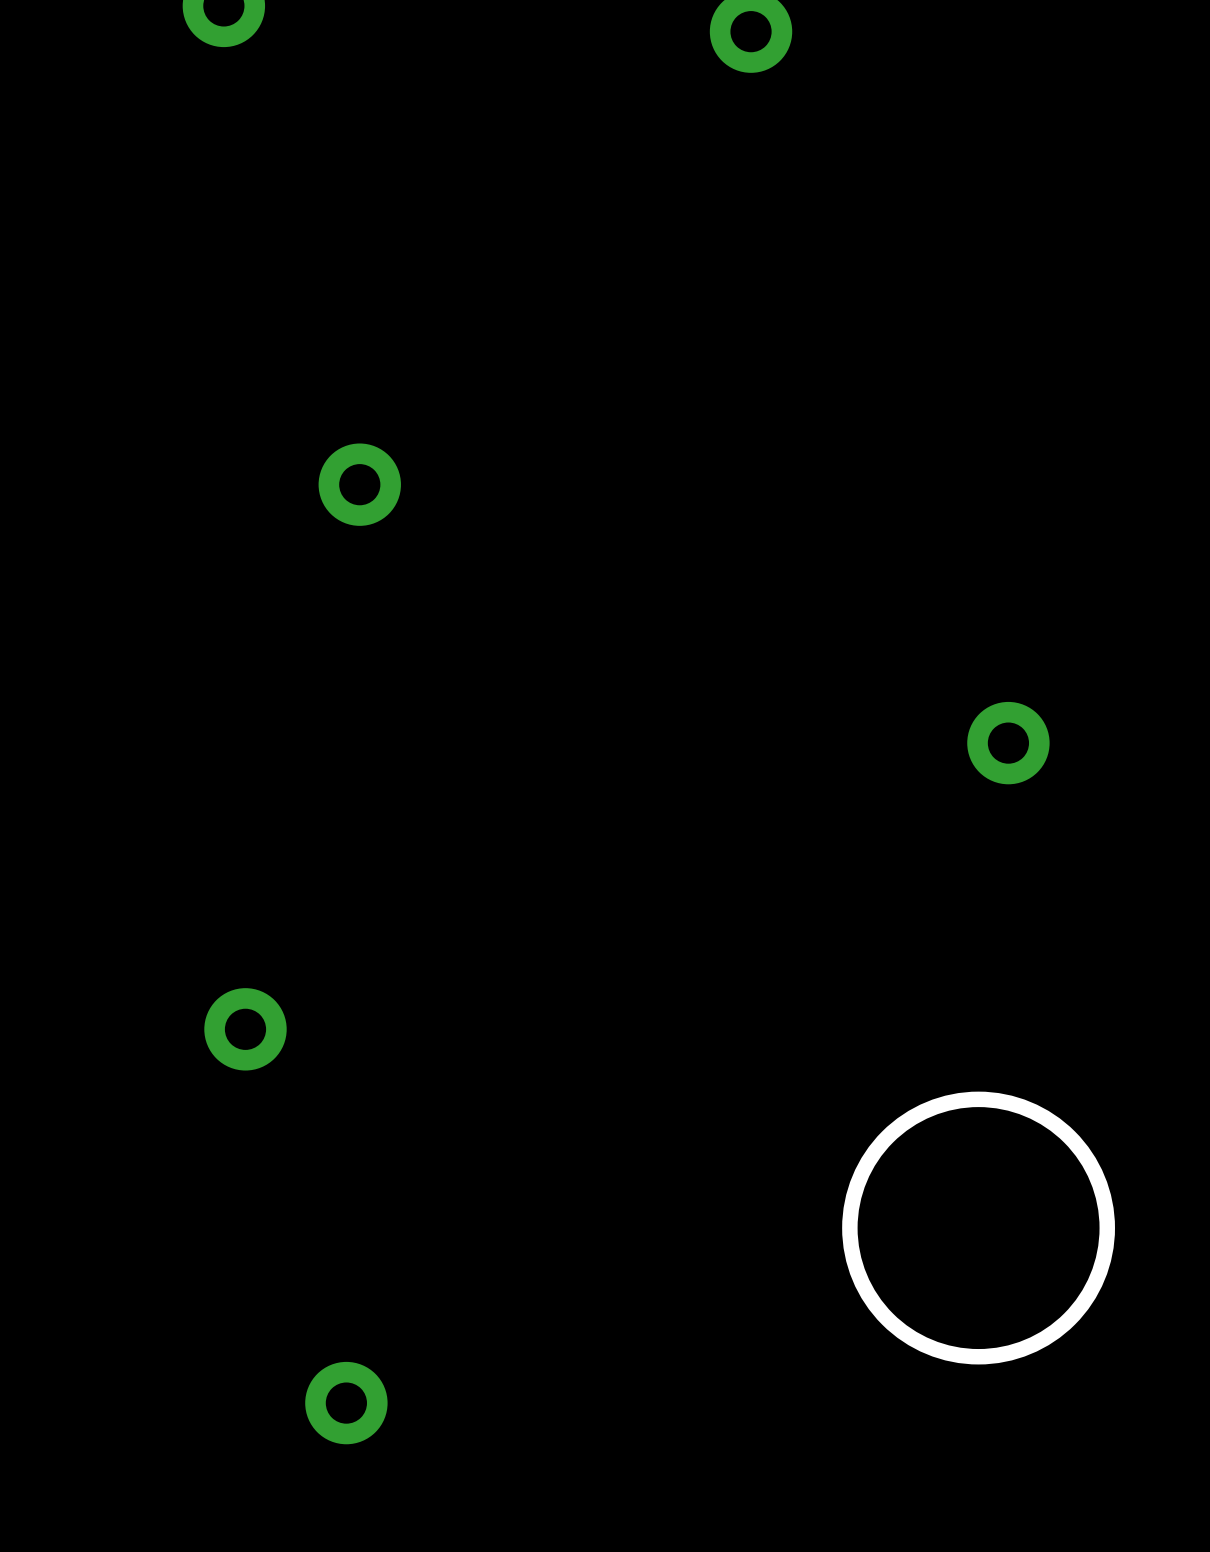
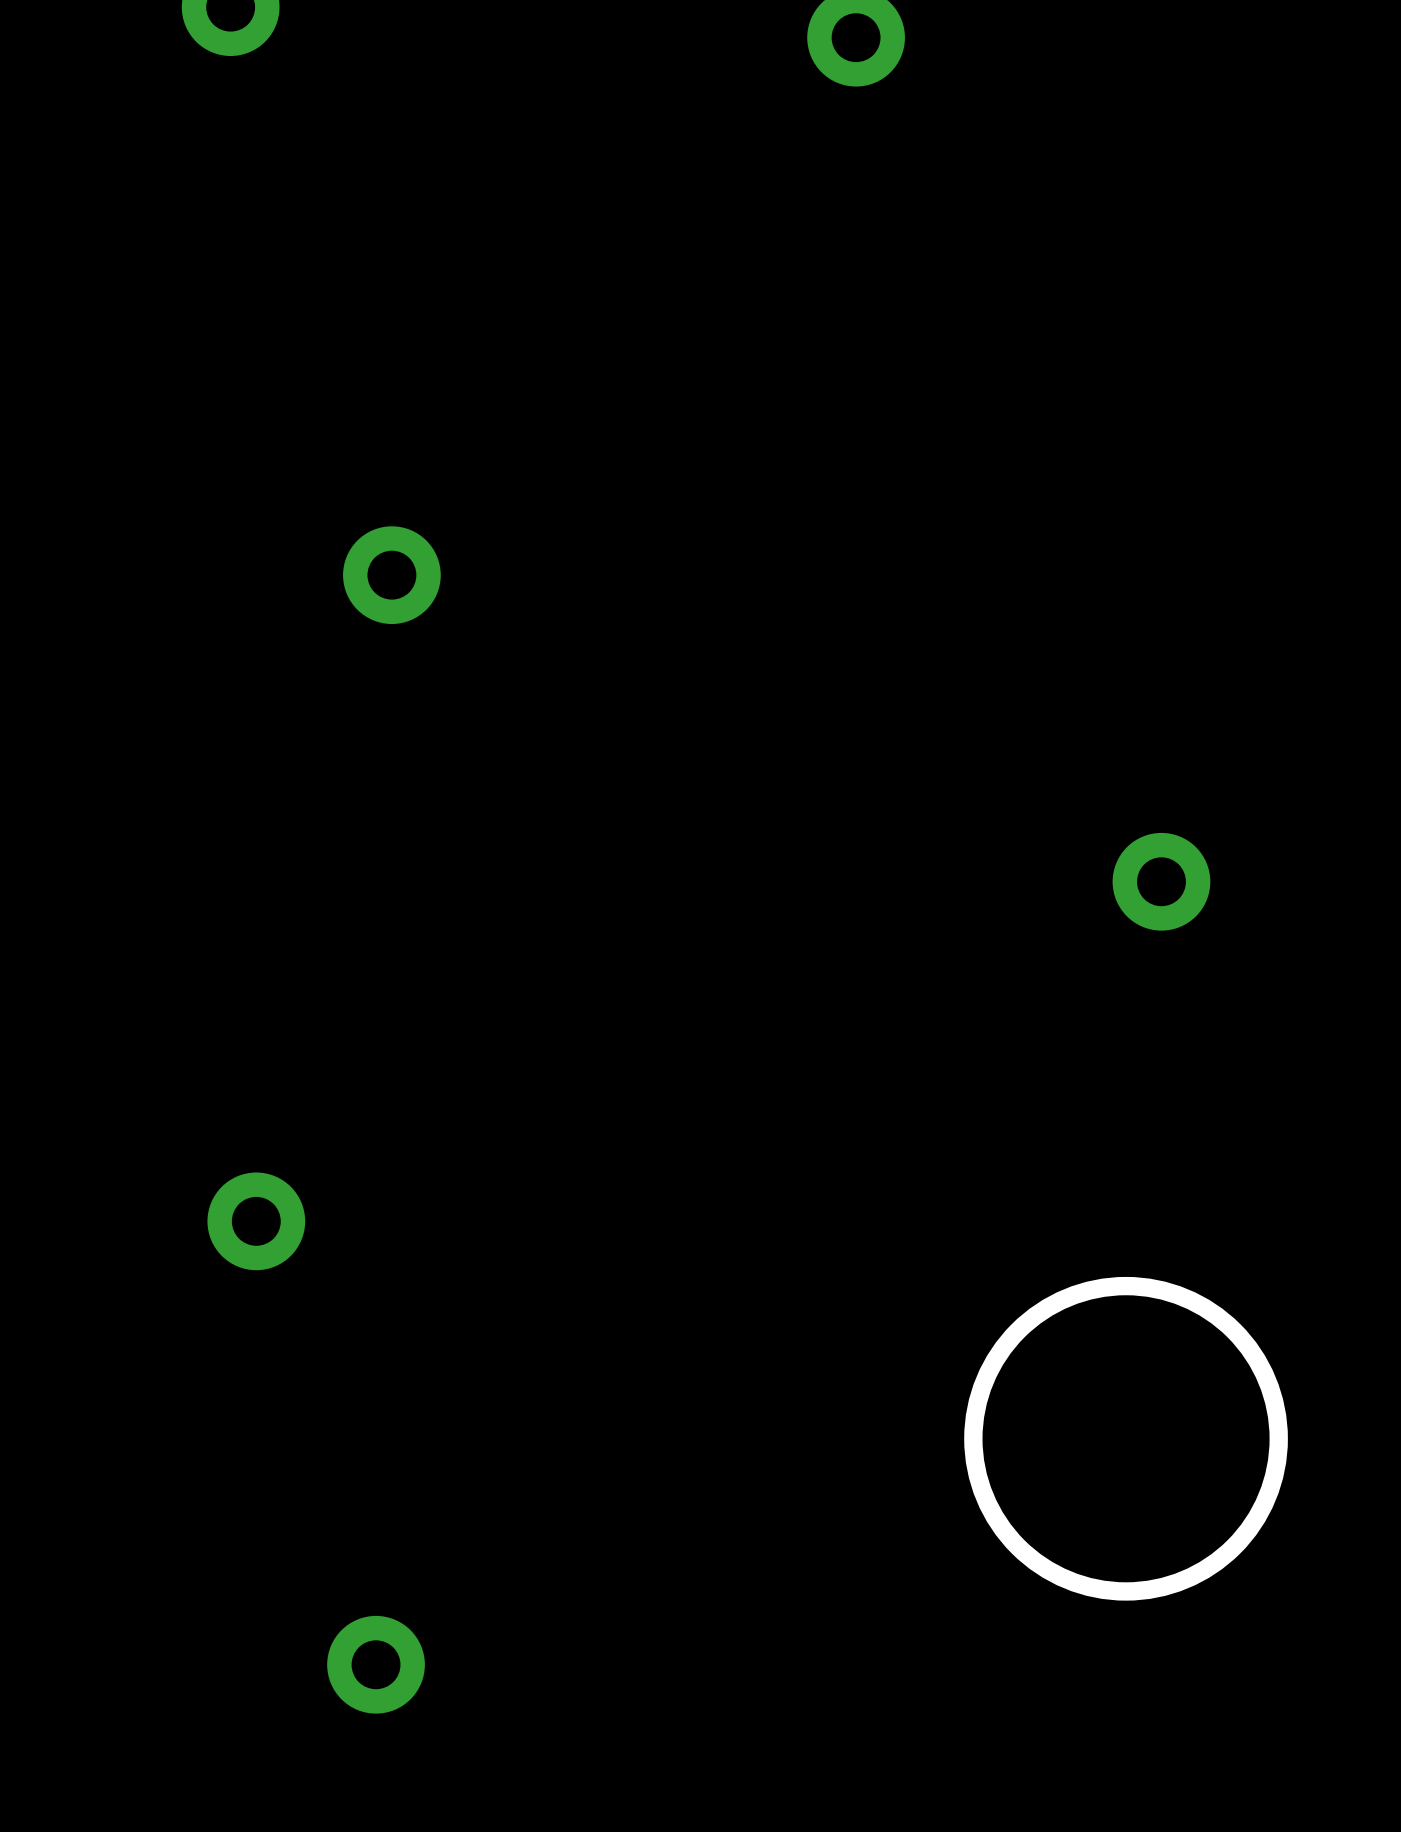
round board edge position: (978, 1228) -> (1126, 1438)

